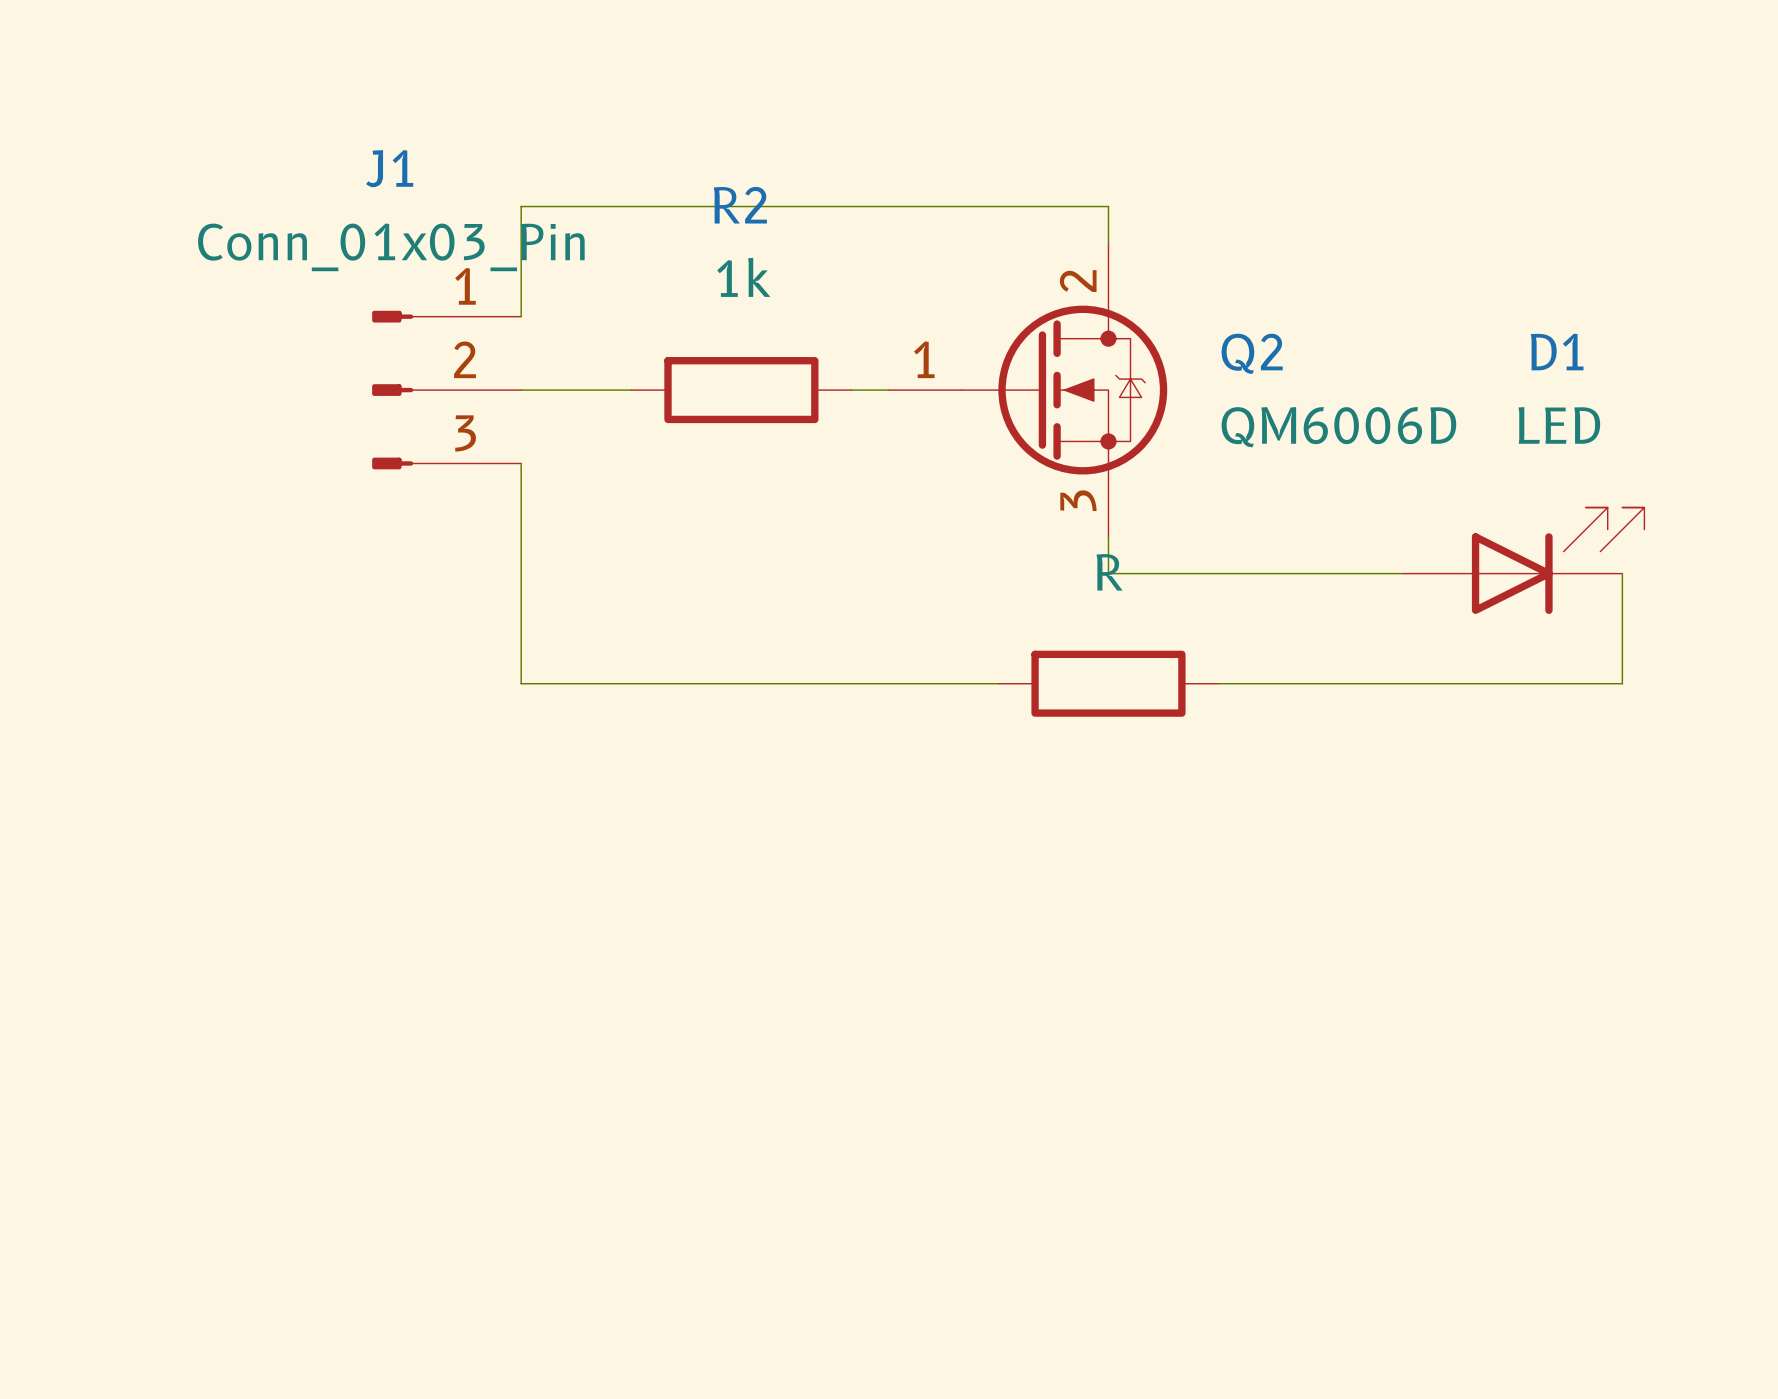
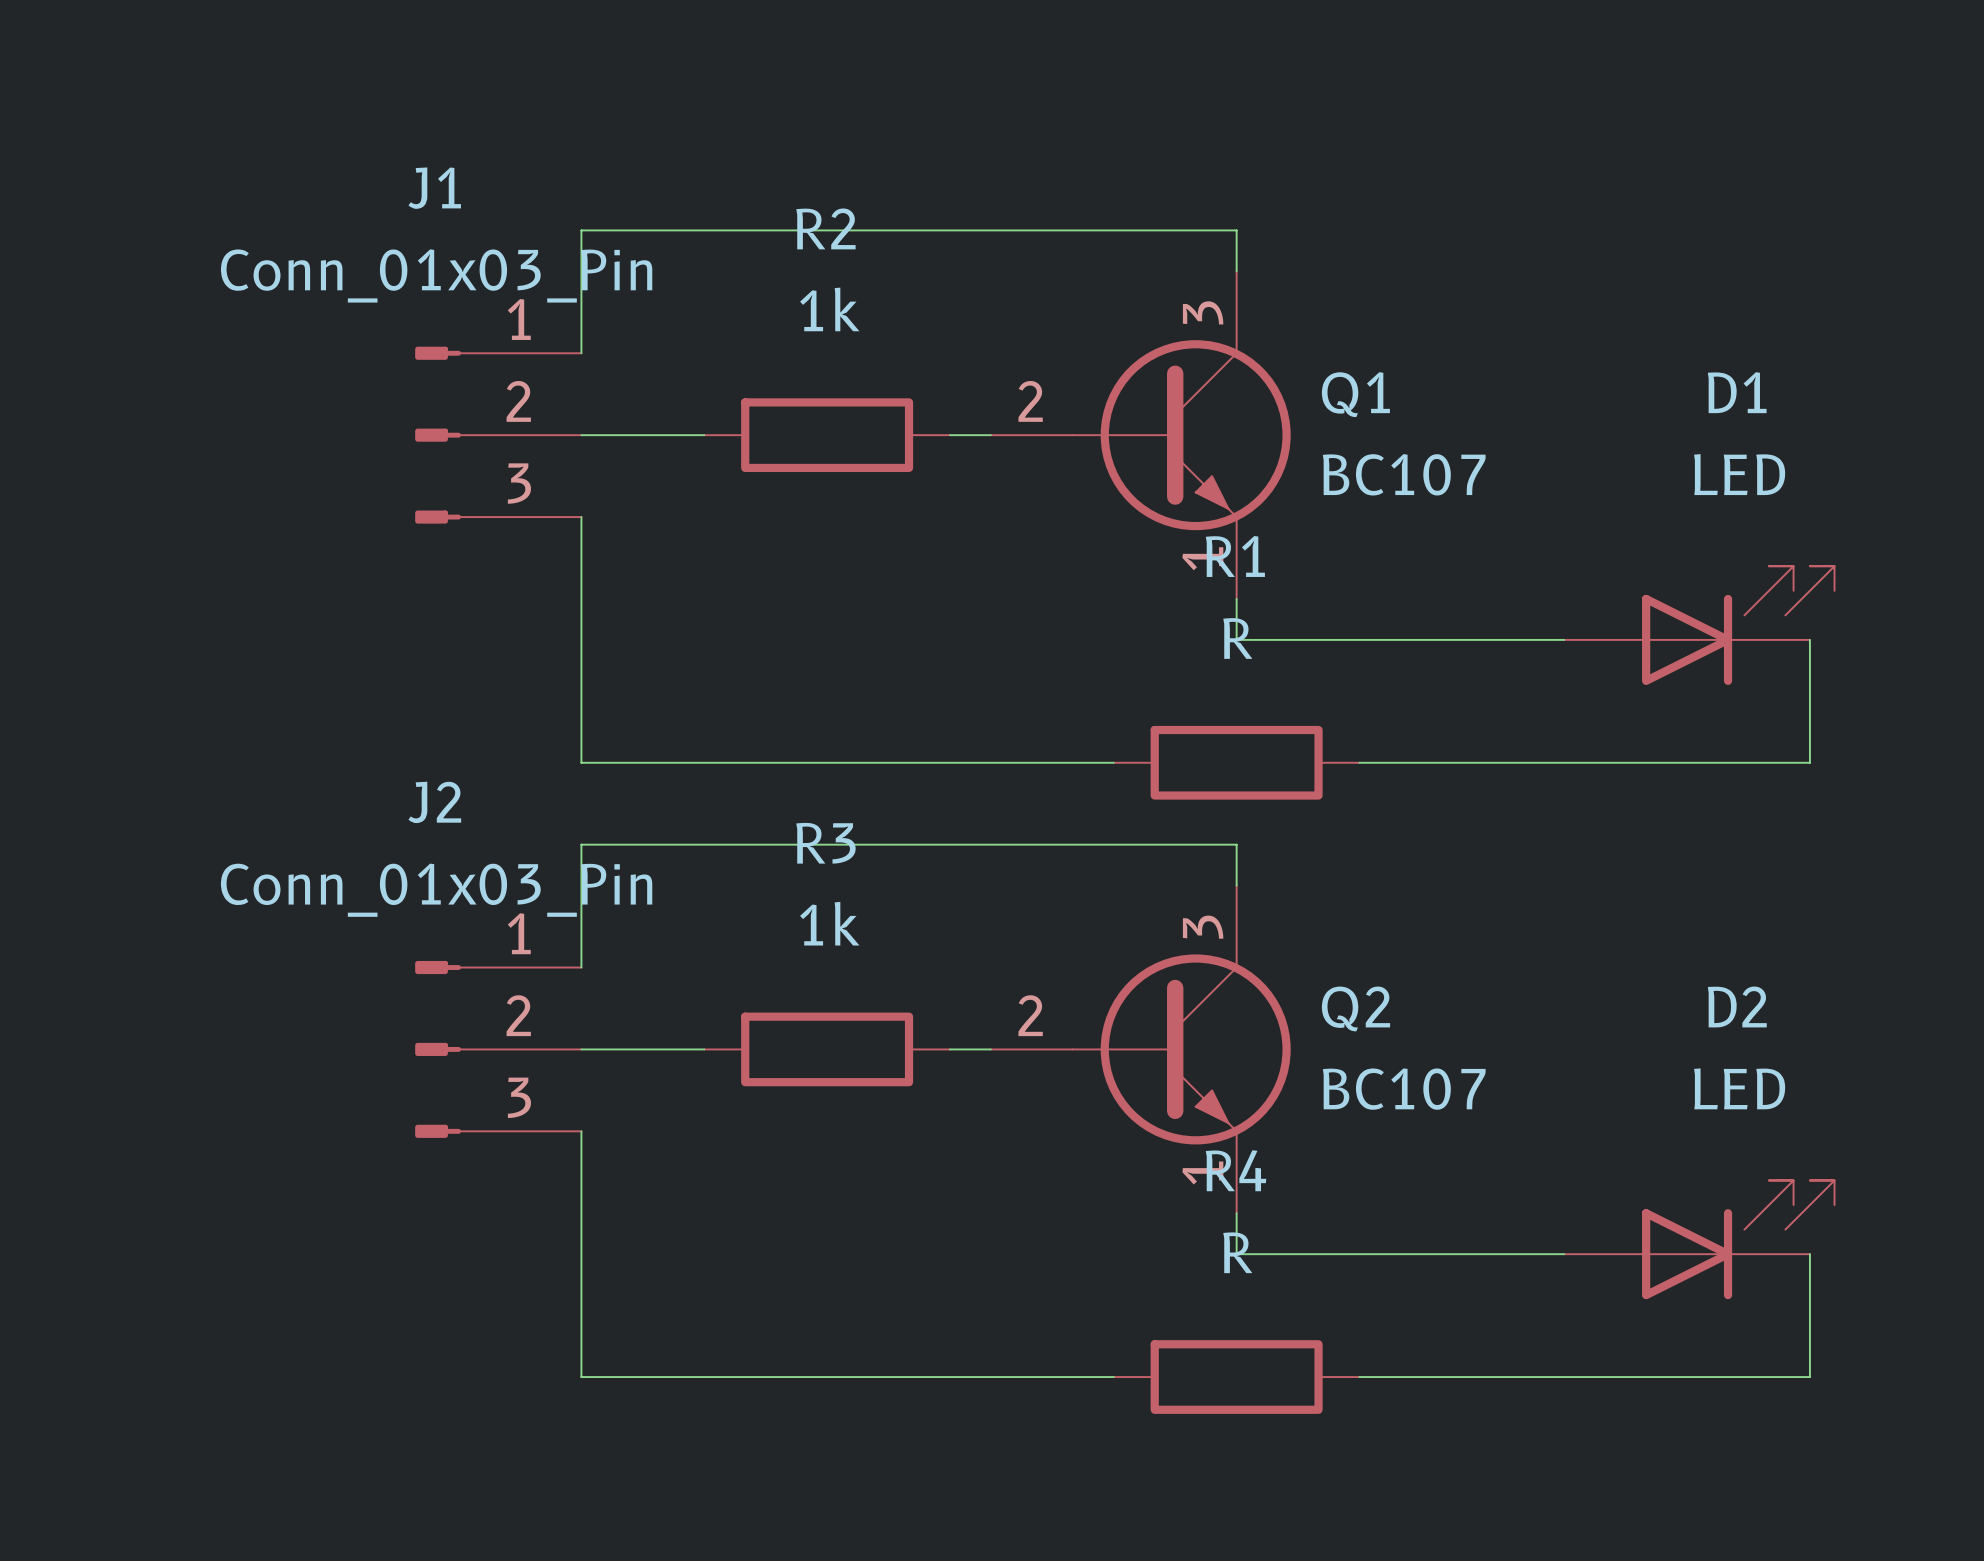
Q2 symbol: [888, 243, 1168, 537] -> [990, 885, 1291, 1214]
Q1: none -> BC107 (1140, 435)
Q2 value: QM6006D (1338, 427) -> BC107 (1404, 1089)
R1 name: none -> R1 (1235, 556)
wire: none -> (1236, 885) (1236, 844) (581, 844) (581, 967)
J2: none -> Conn_01x03_Pin (498, 1049)
wire: none -> (581, 1049) (704, 1049)
R3: none -> 1k (827, 1049)
wire: none -> (949, 1049) (990, 1049)
wire: none -> (581, 1131) (581, 1377) (1113, 1377)
wire: none -> (1236, 1213) (1236, 1254) (1564, 1254)
D2: none -> LED (1699, 1239)
wire: none -> (1809, 1254) (1809, 1377) (1359, 1377)
R4: none -> R (1236, 1377)

